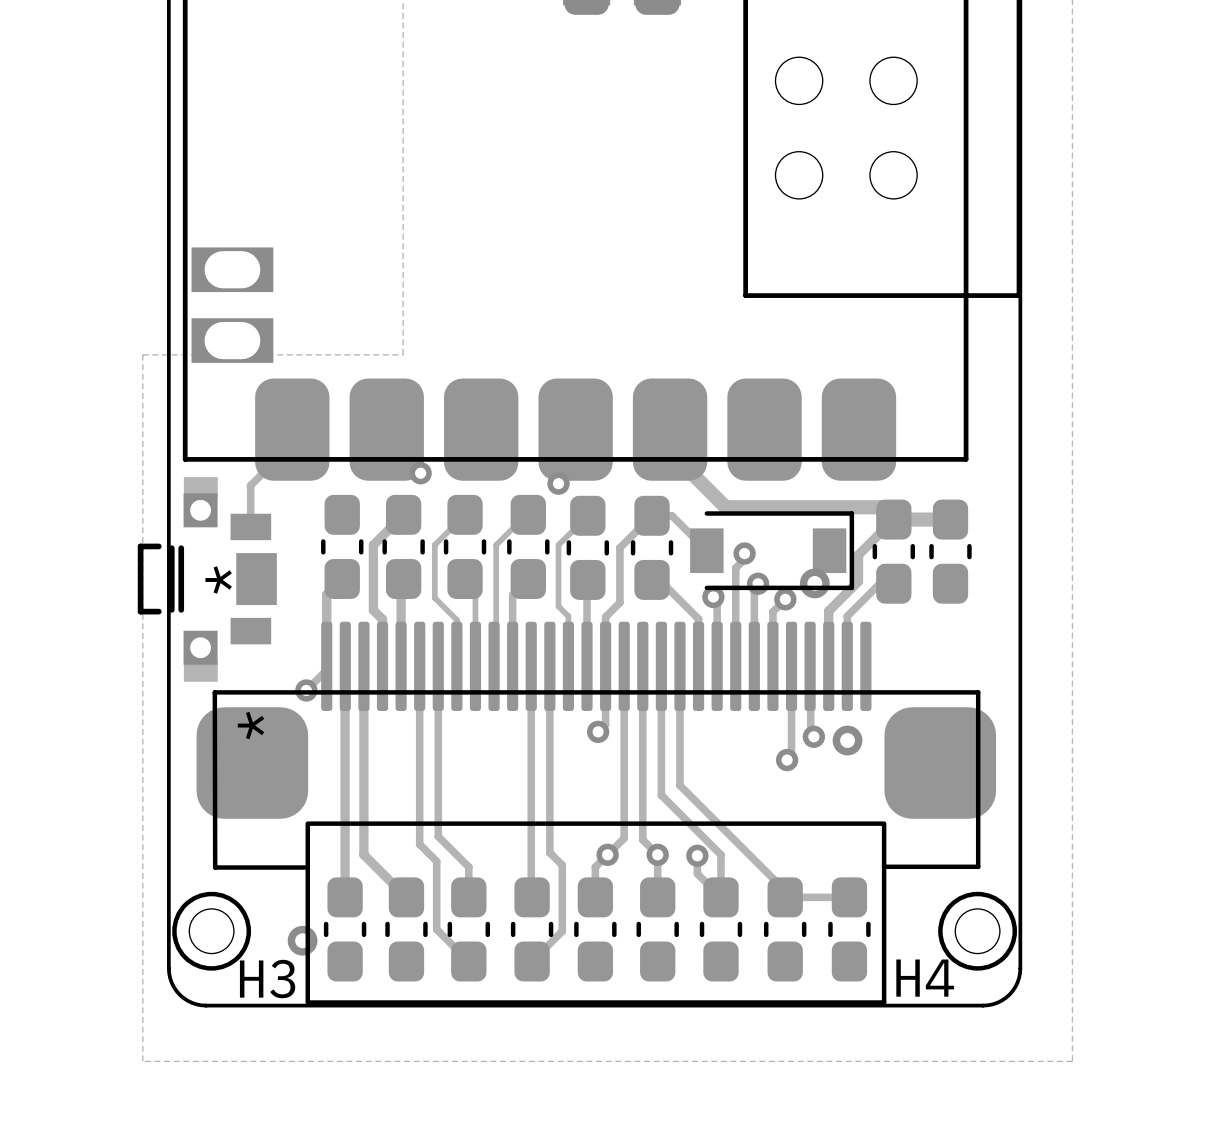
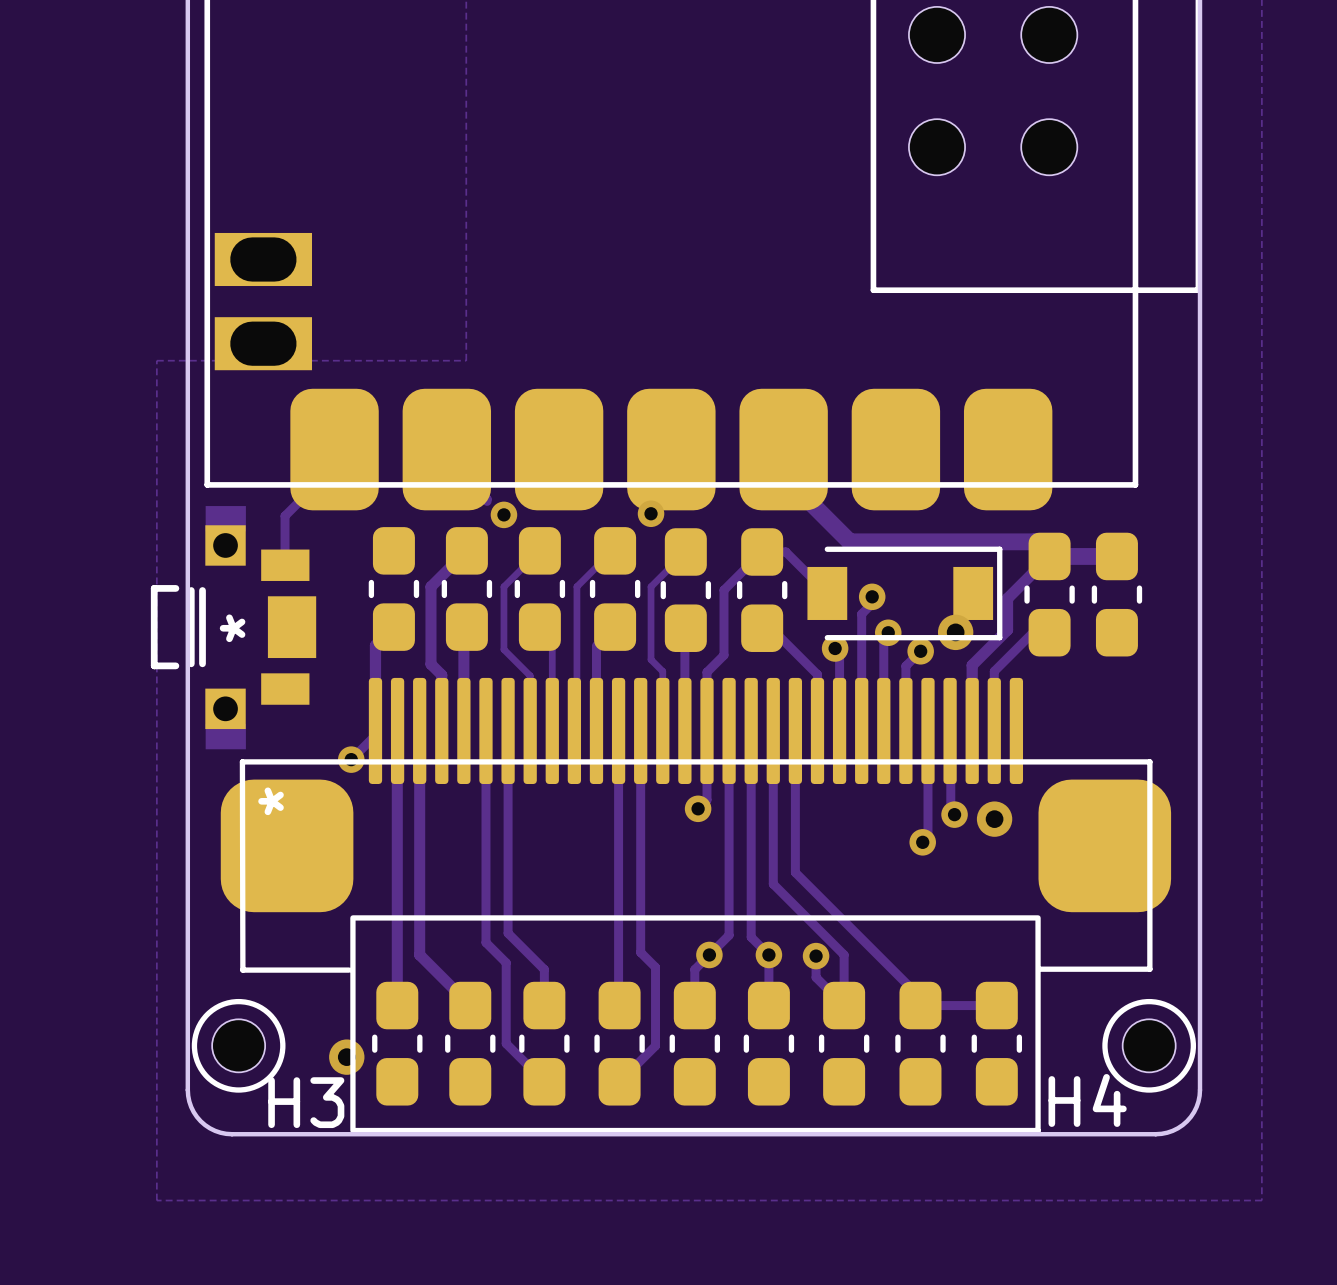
via position: (420, 473) -> (503, 514)

